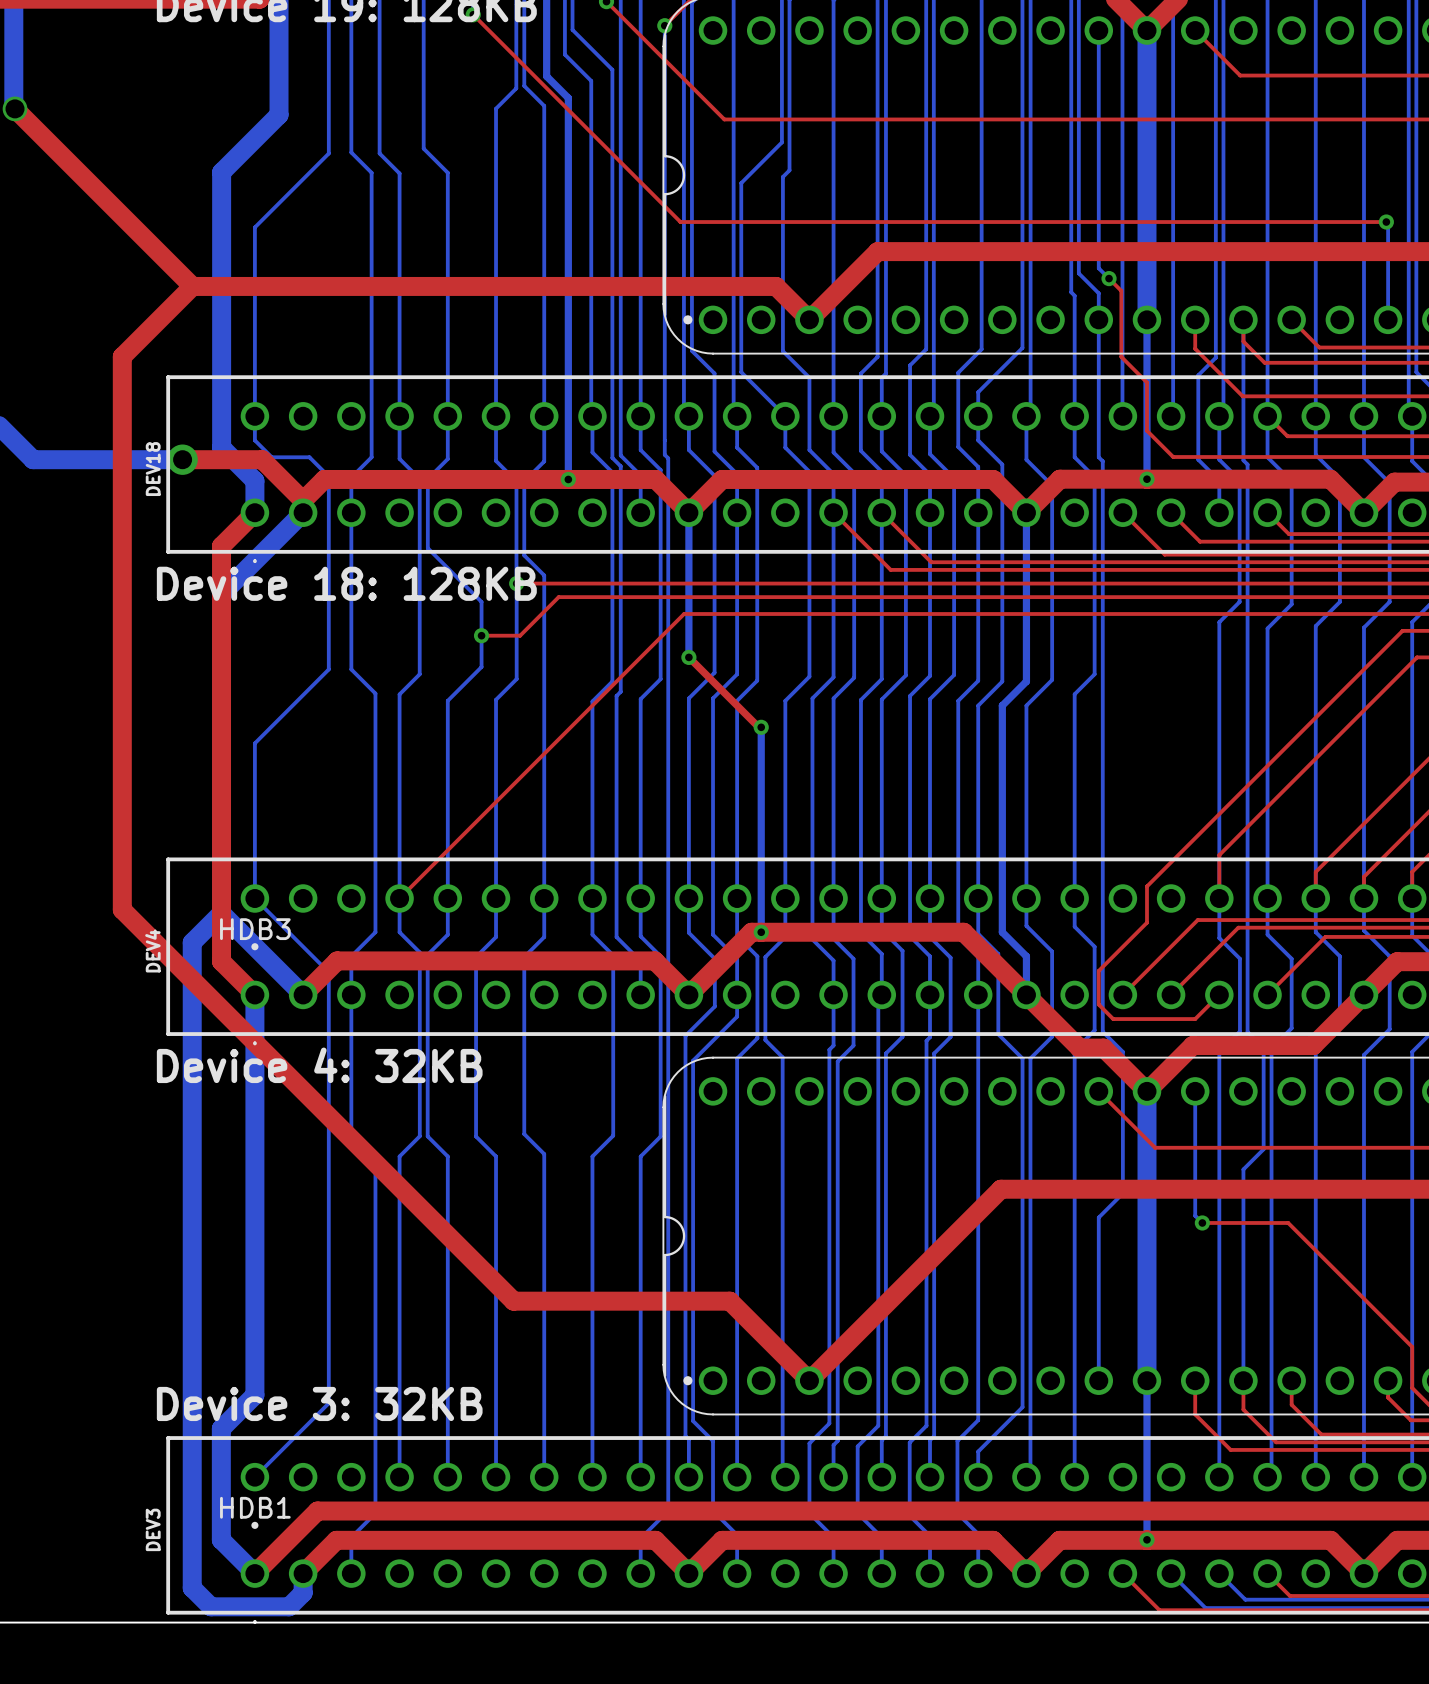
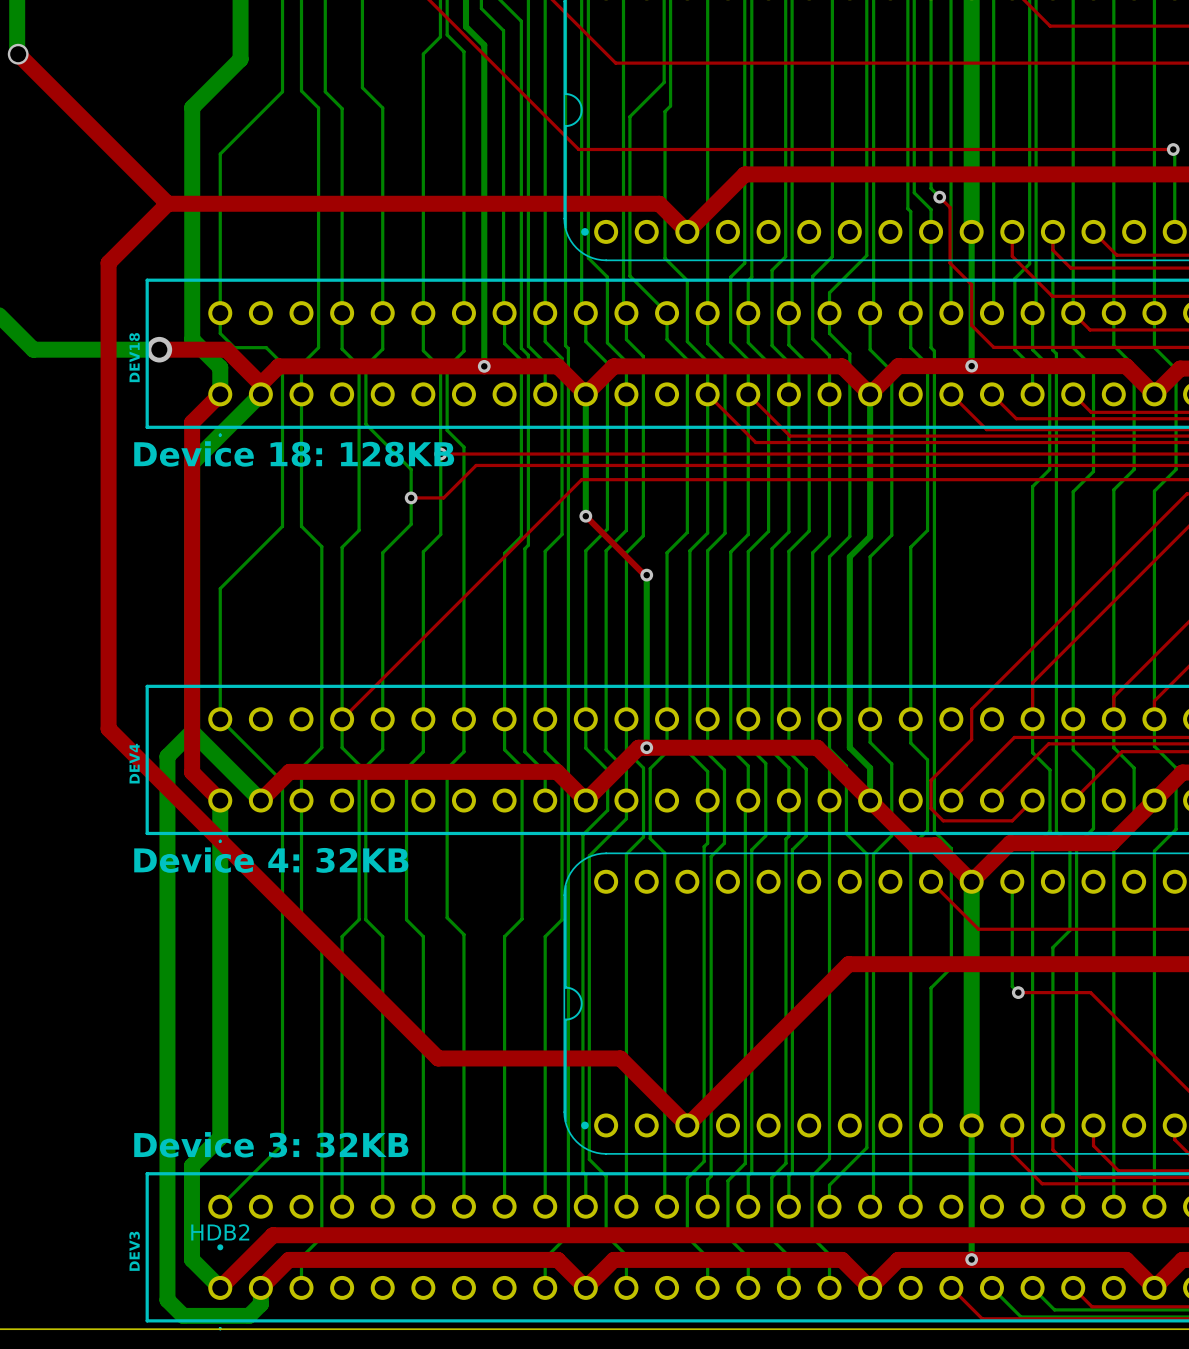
HDB3: (254, 946) -> none
HDB1 name: HDB1 (255, 1507) -> HDB2 (220, 1232)

